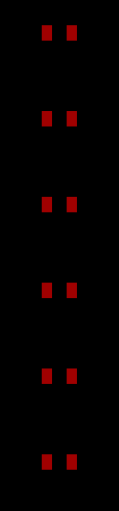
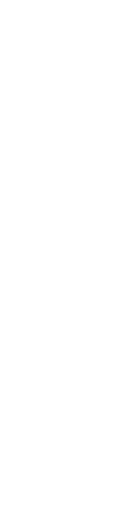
part: (59, 32) -> none
part: (59, 118) -> none
part: (59, 204) -> none
part: (59, 290) -> none
part: (59, 376) -> none
part: (59, 462) -> none

